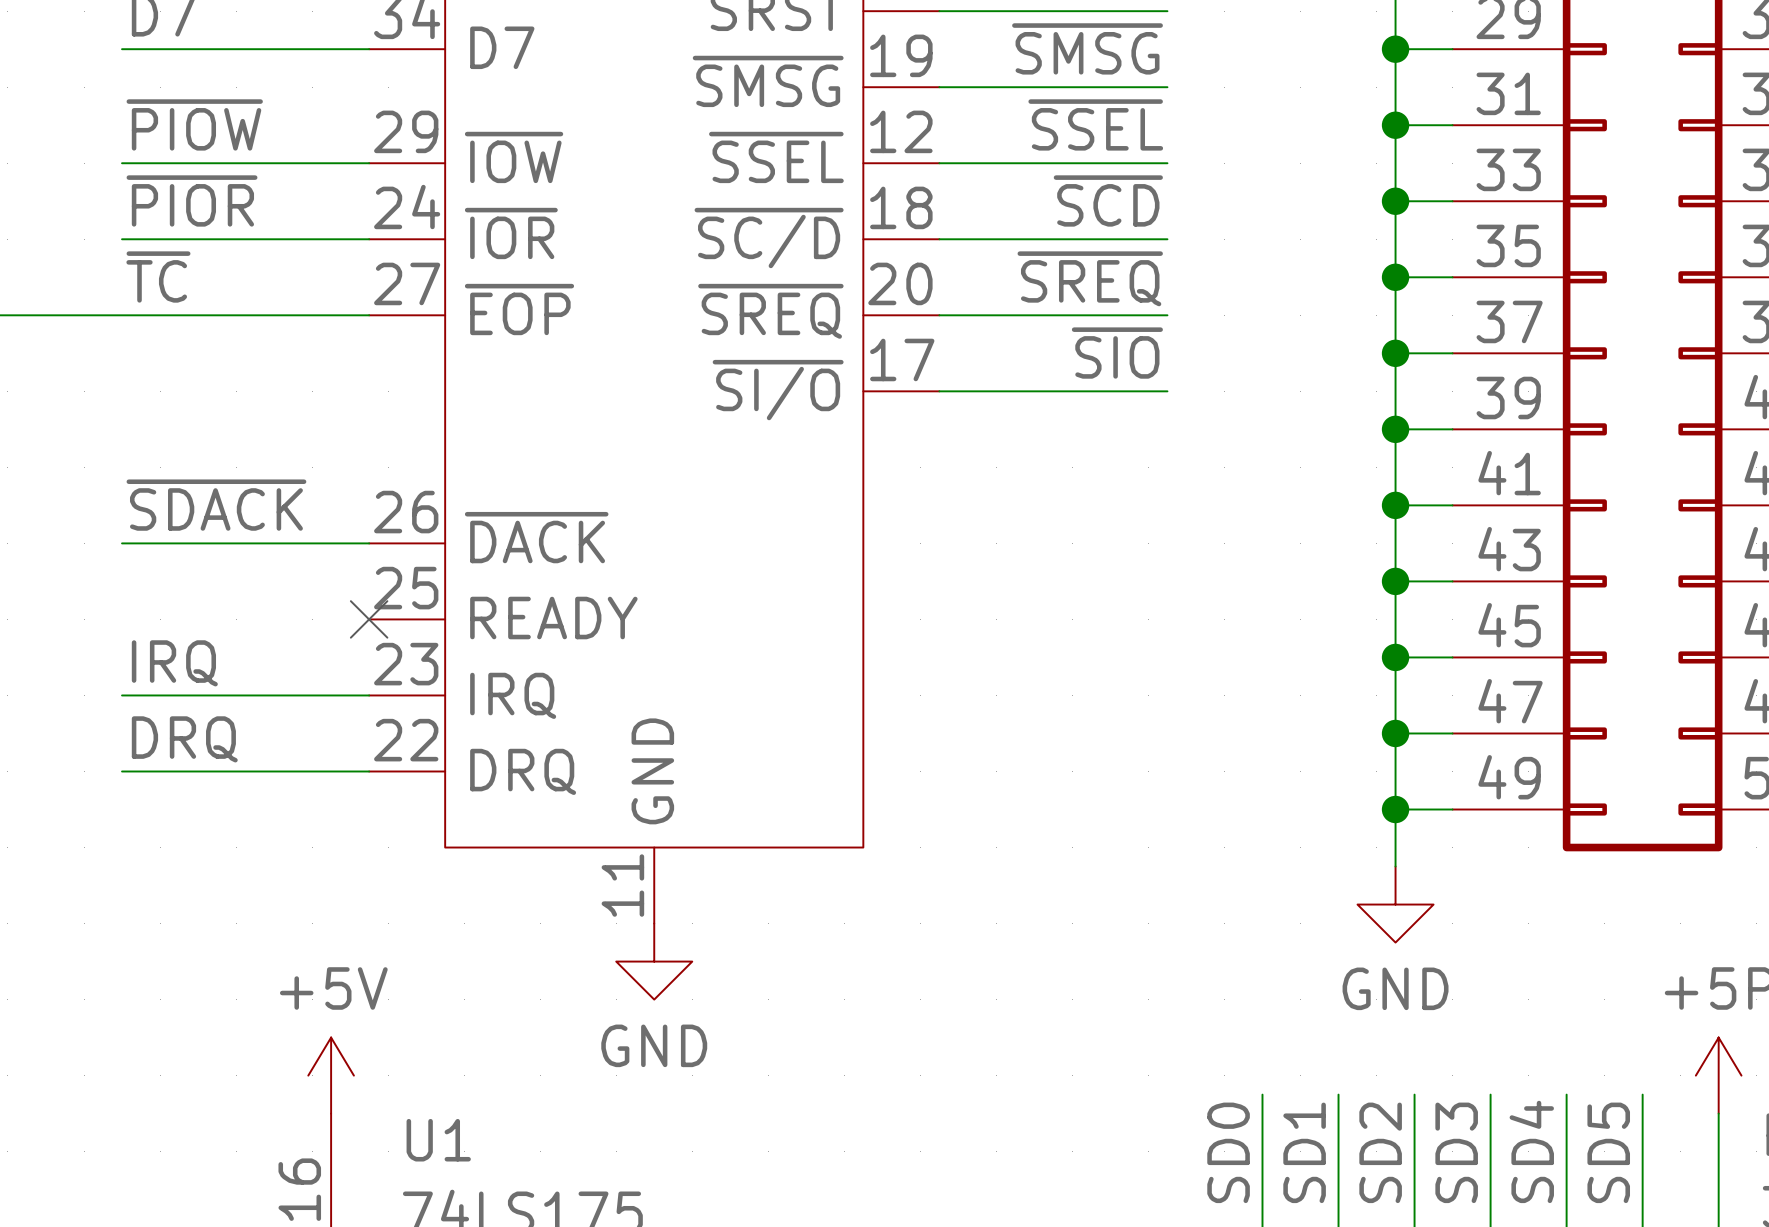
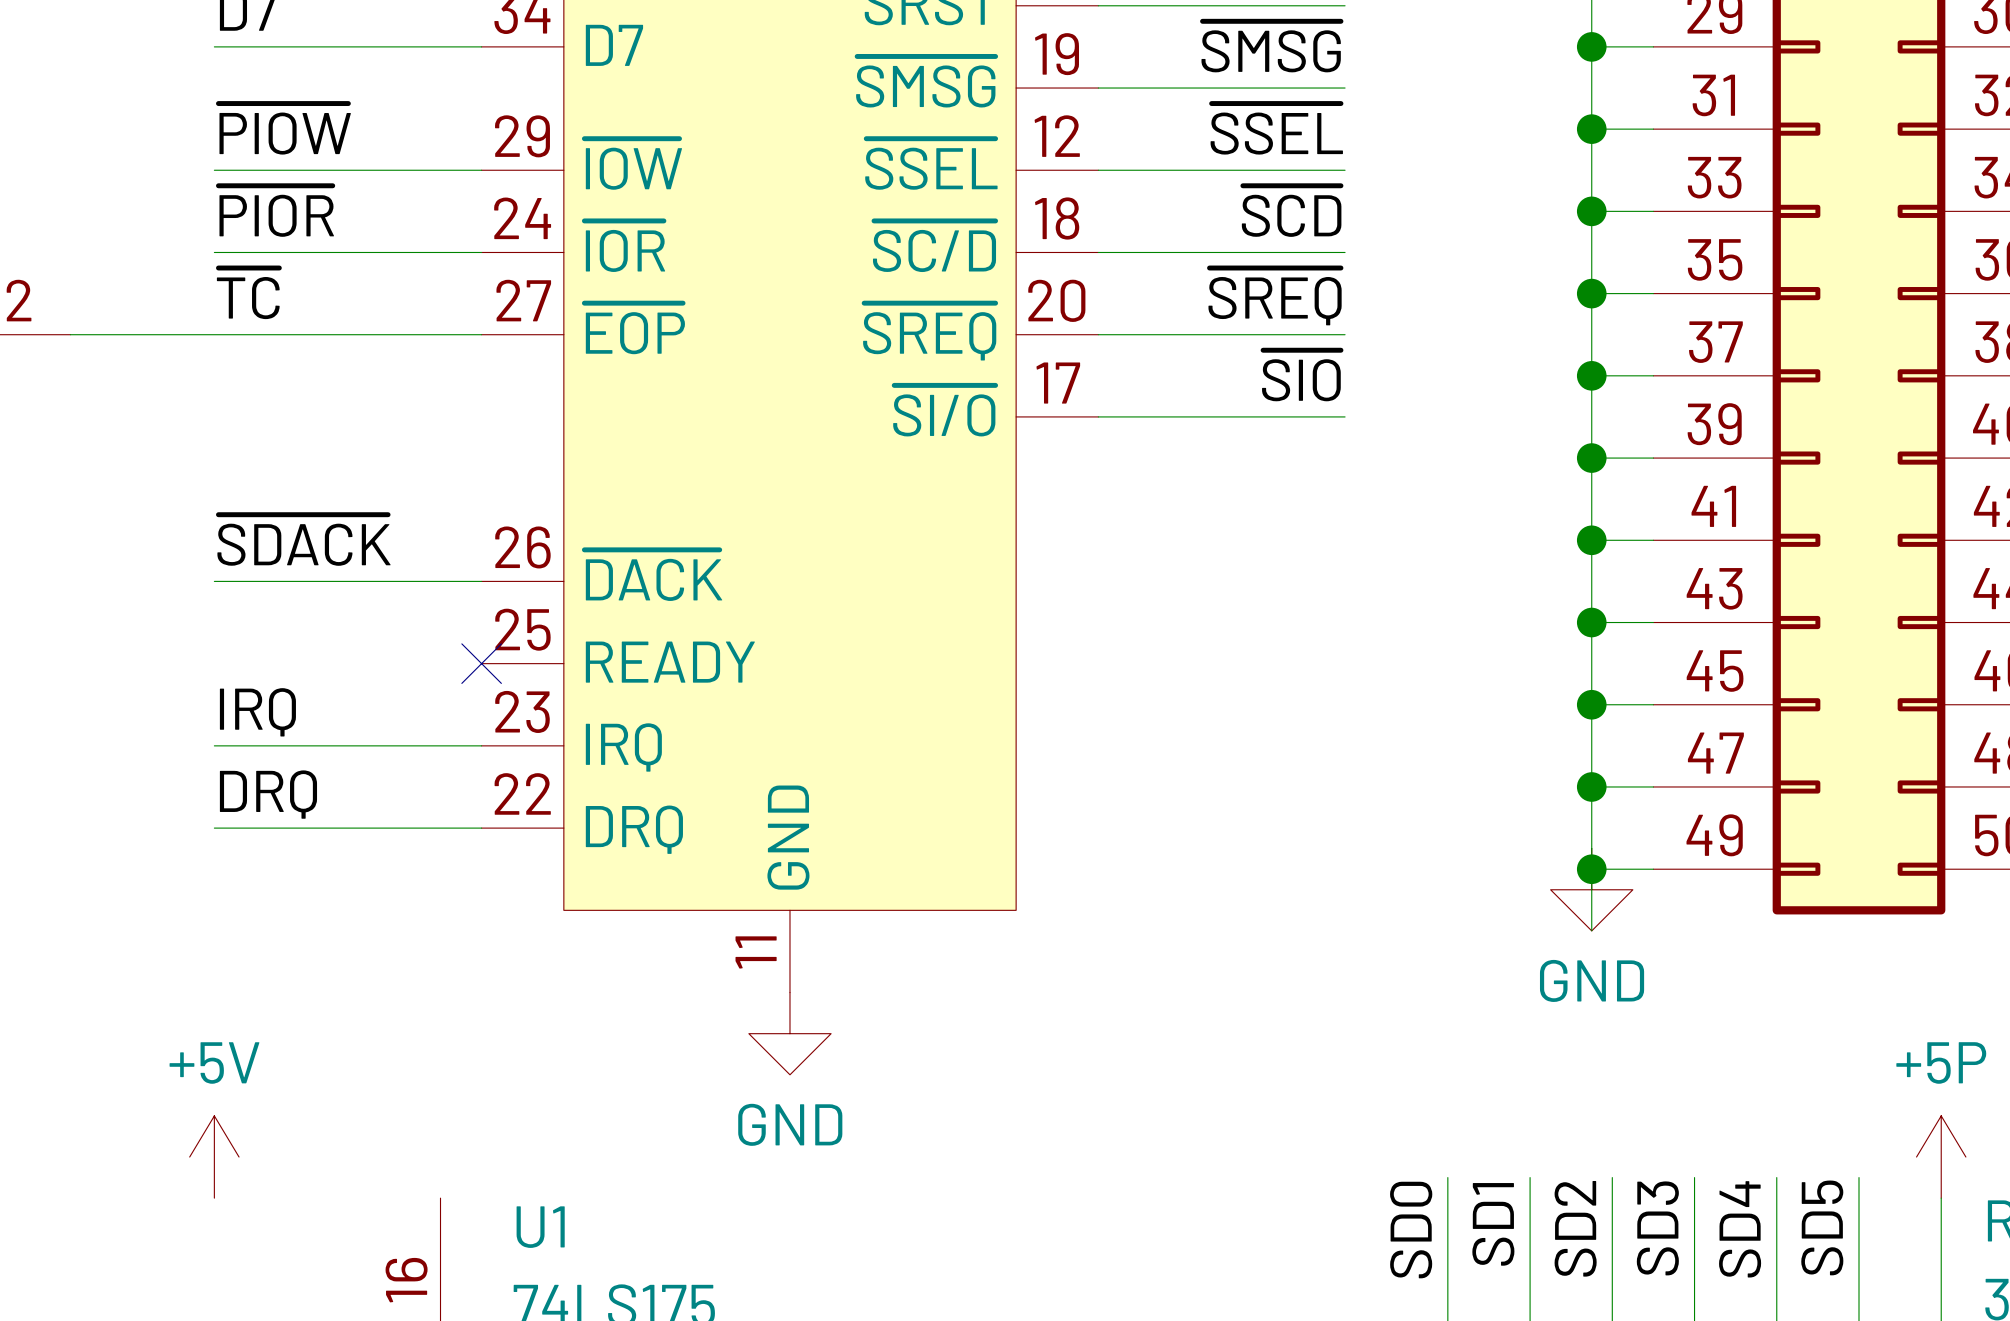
power symbol position: GND (1395, 904) -> GND (1591, 889)
power symbol position: +5V (331, 1075) -> +5V (214, 1157)

